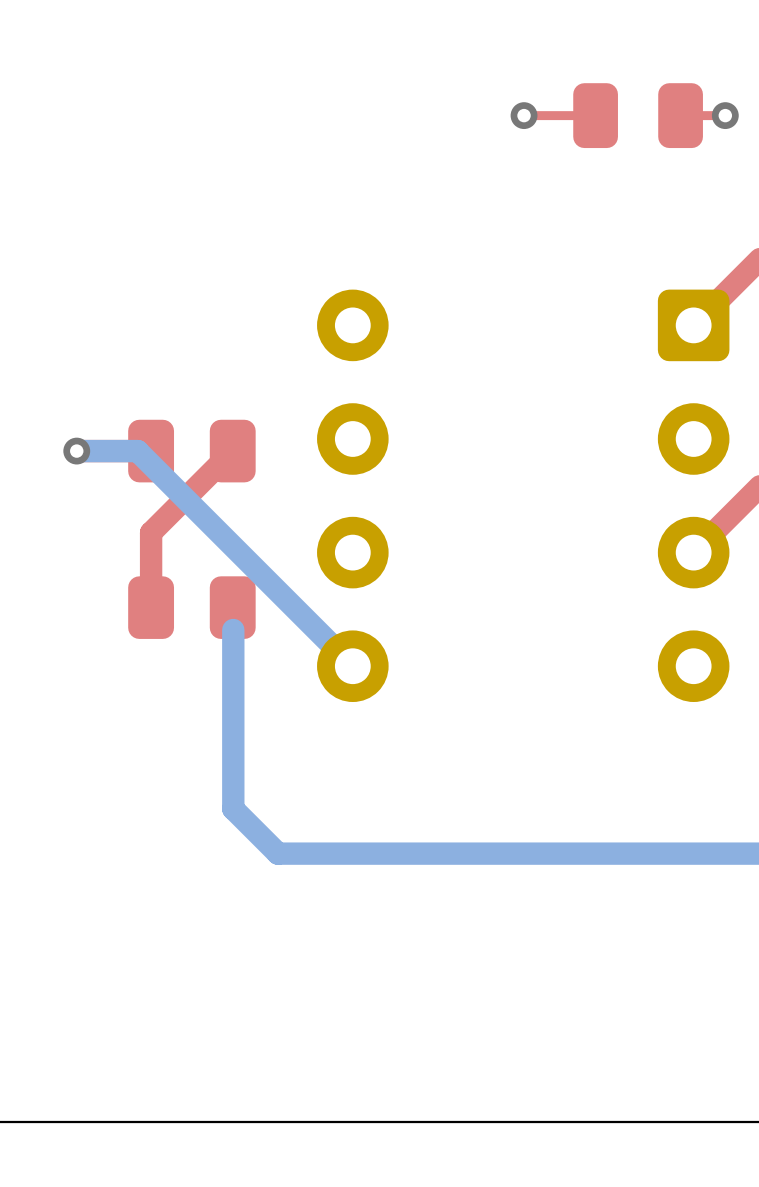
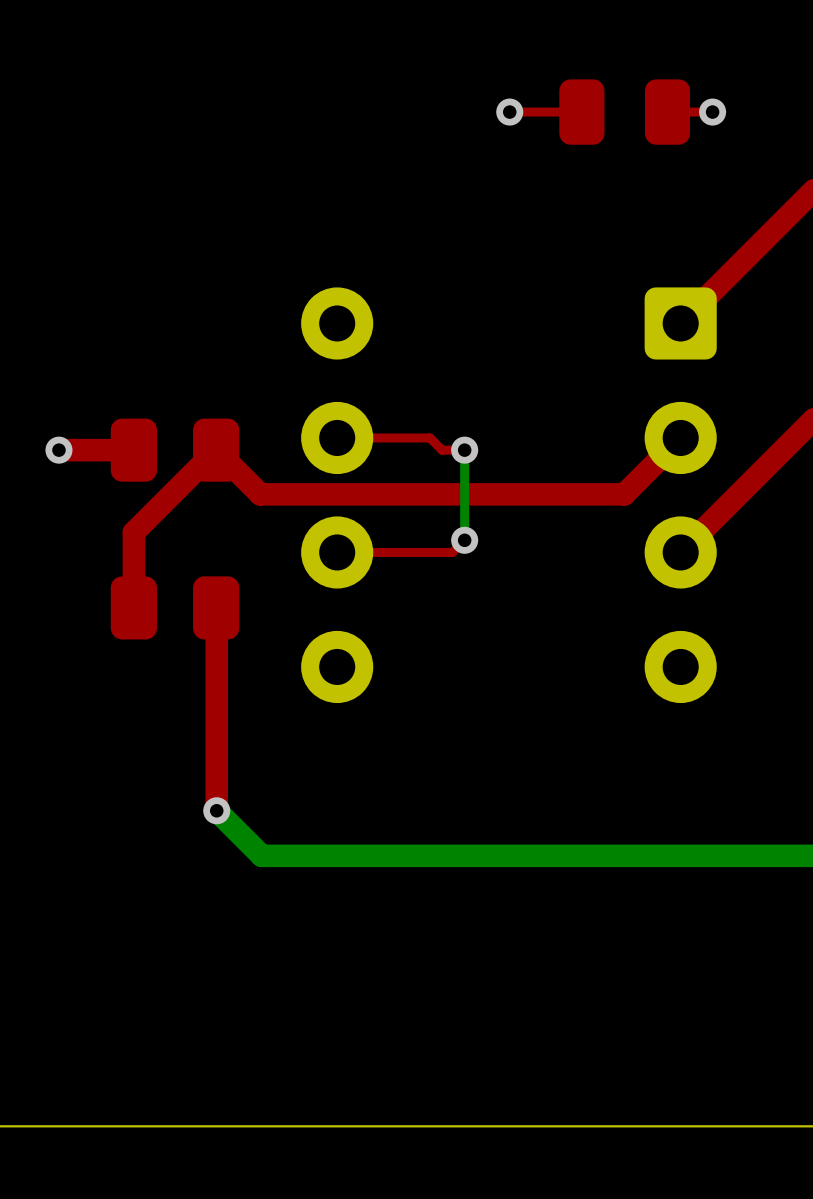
top track: none -> (337, 437) (429, 437) (442, 450) (464, 450)
top track: none -> (680, 437) (624, 494) (260, 494) (216, 450)
bottom track: (76, 451) (137, 451) (352, 666) -> none
bottom track: none -> (464, 450) (464, 540)
via: none -> (464, 450)
top track: none -> (464, 540) (452, 552) (337, 552)
via: none -> (464, 540)
top track: none -> (216, 608) (216, 810)
bottom track: (233, 629) (233, 808) -> none
via: none -> (216, 810)

